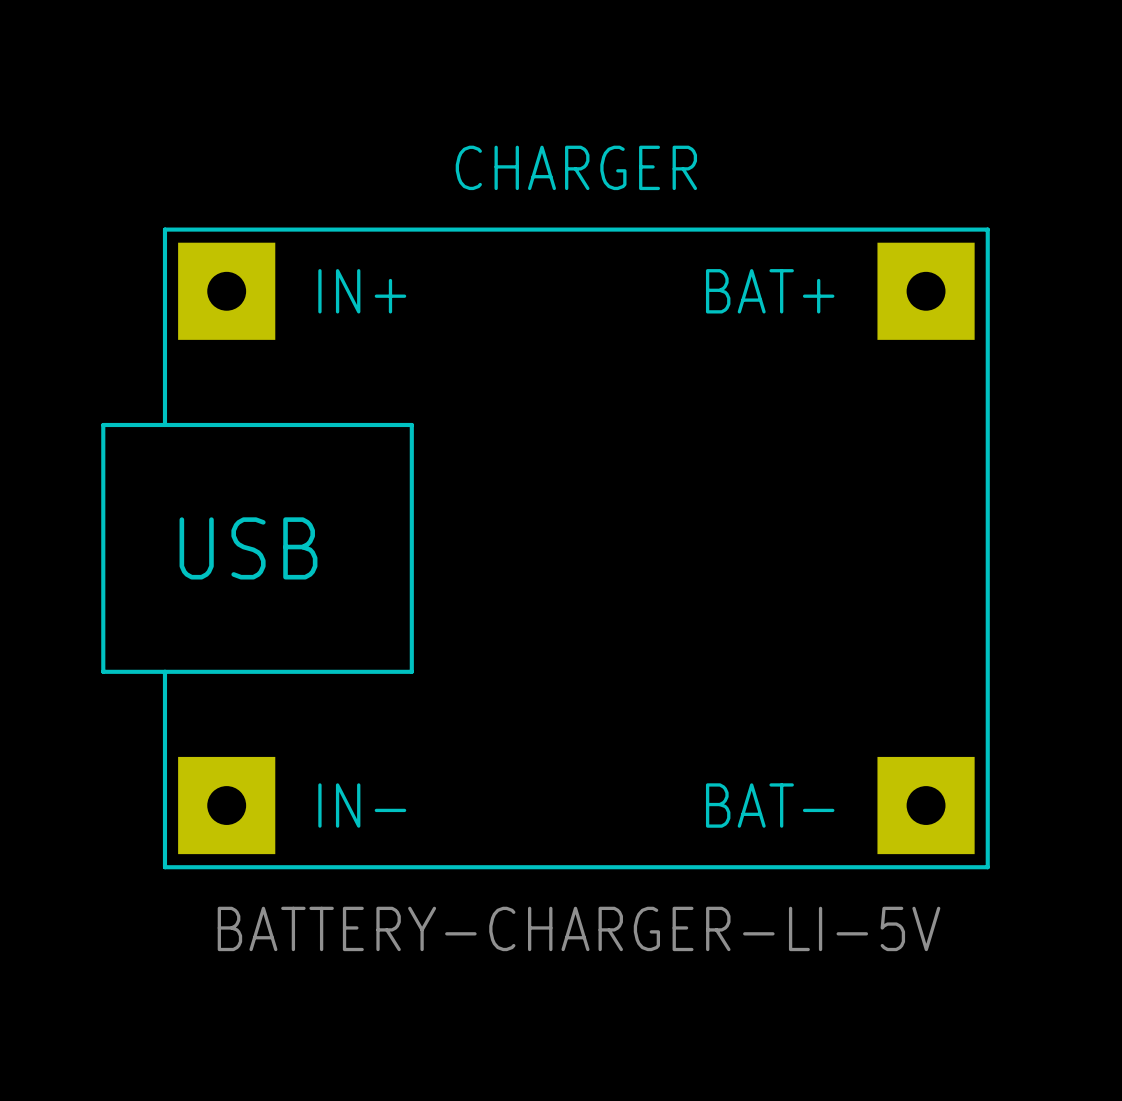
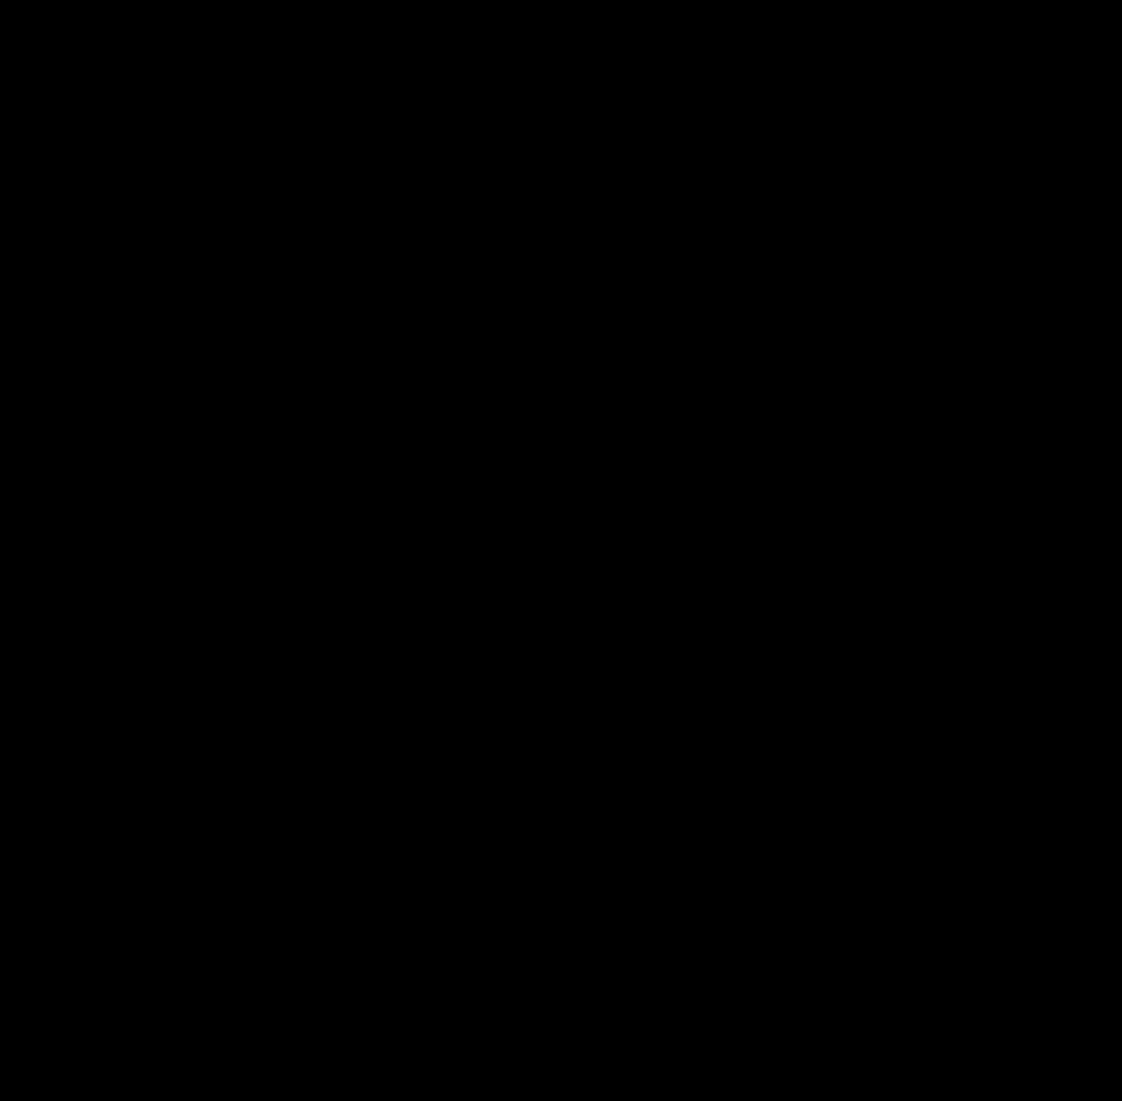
CHARGER: BATTERY-CHARGER-LI-5V (545, 548) -> none

